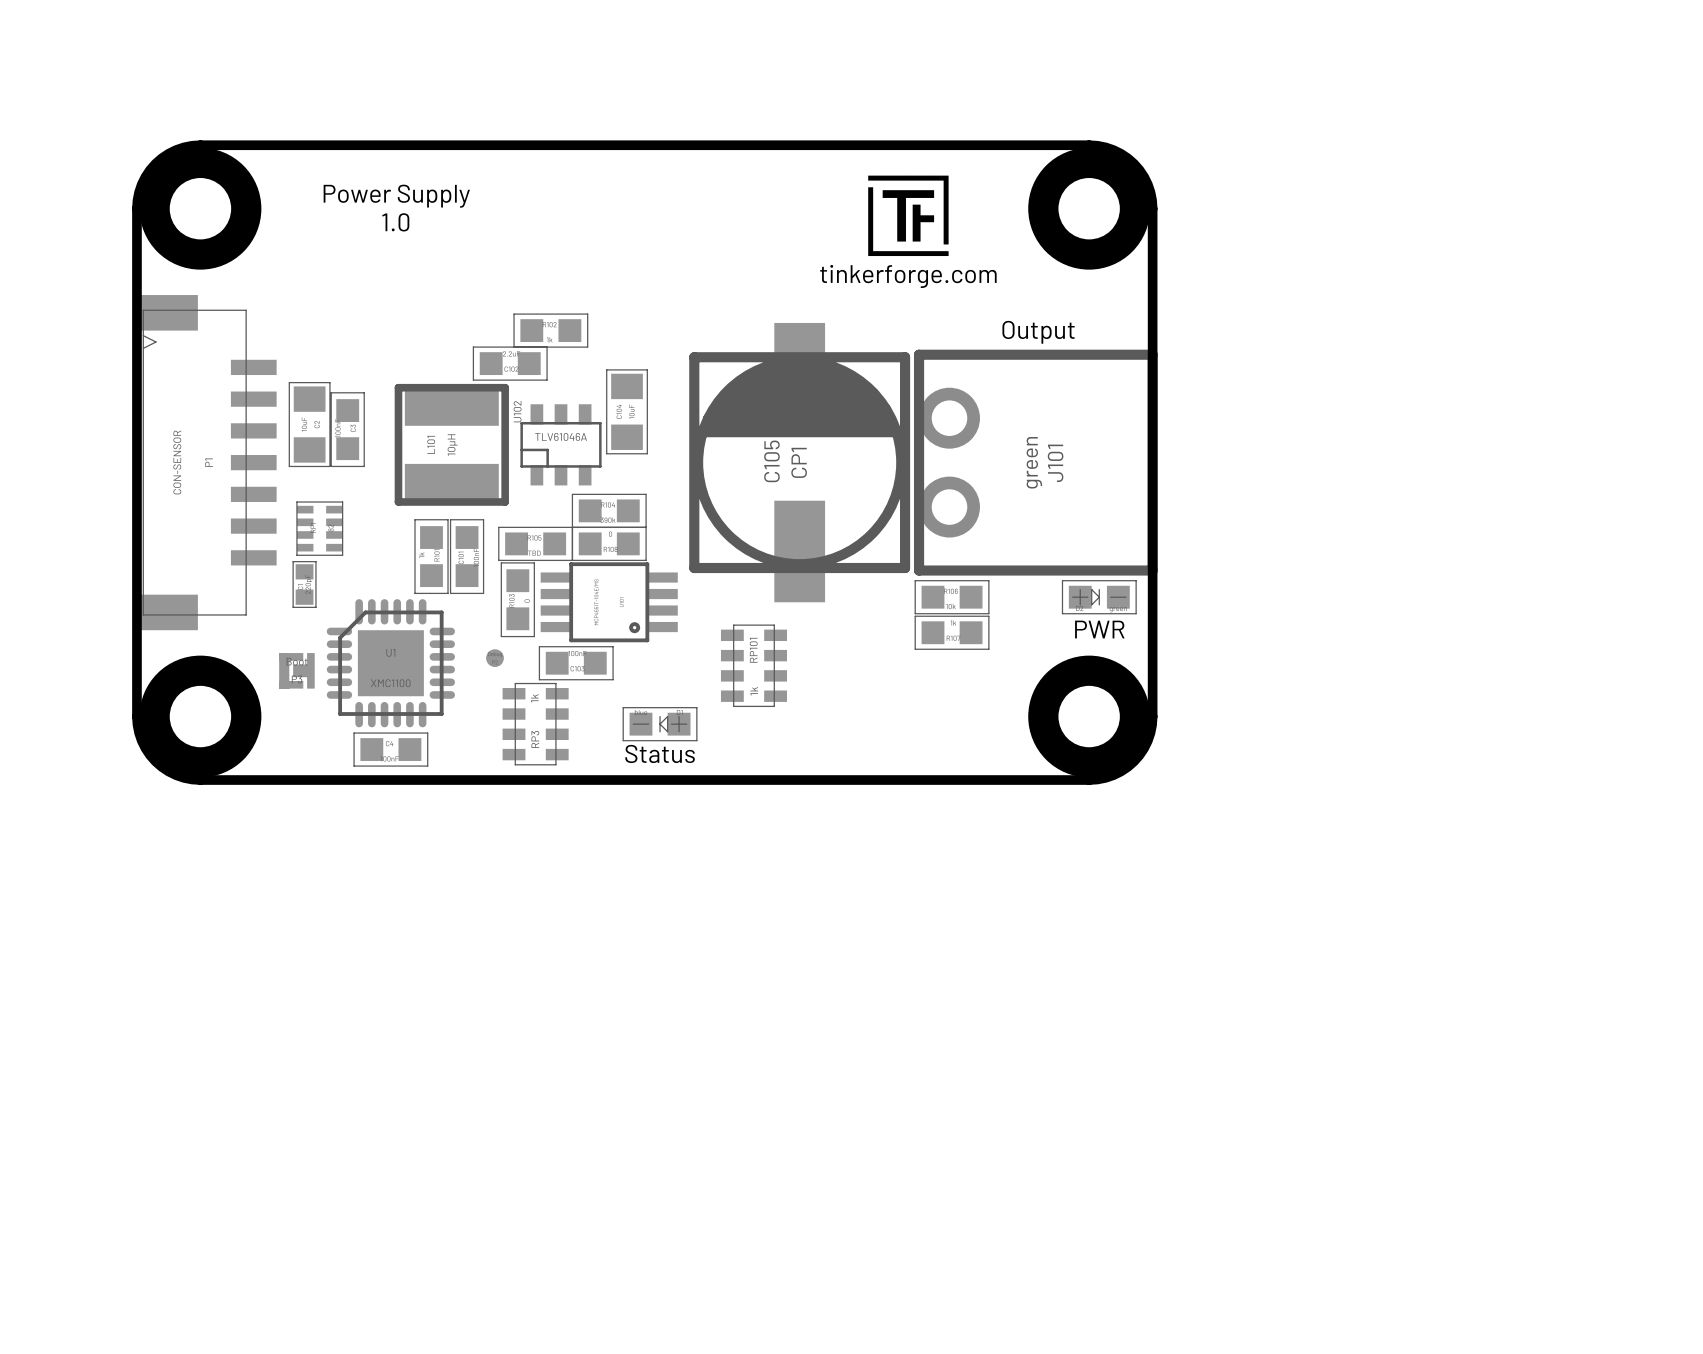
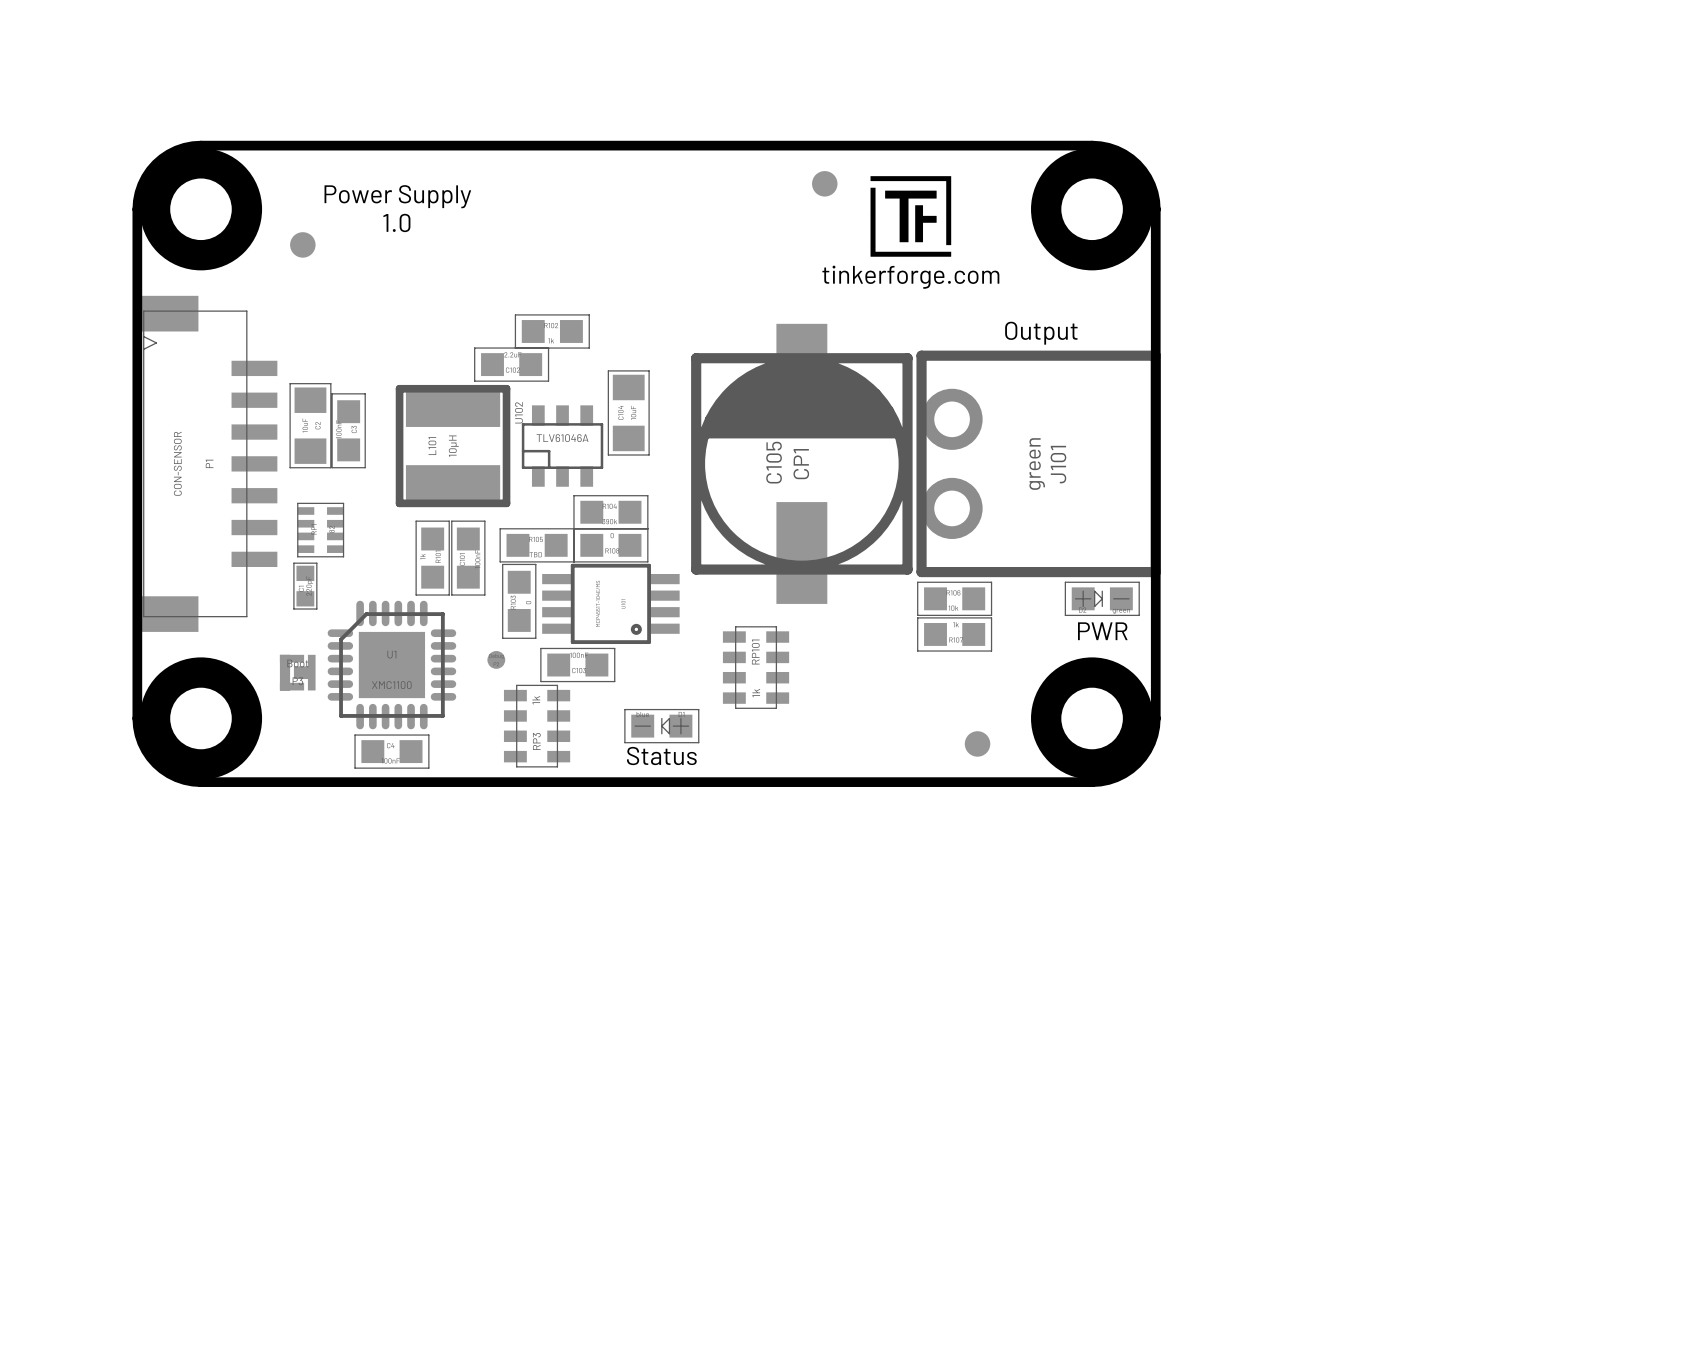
part: none -> (824, 183)
part: none -> (302, 244)
part: none -> (977, 743)

